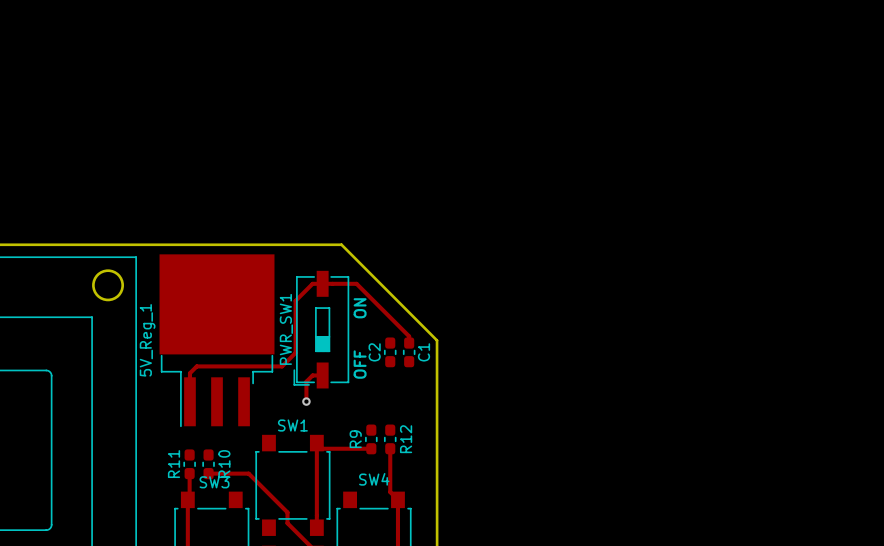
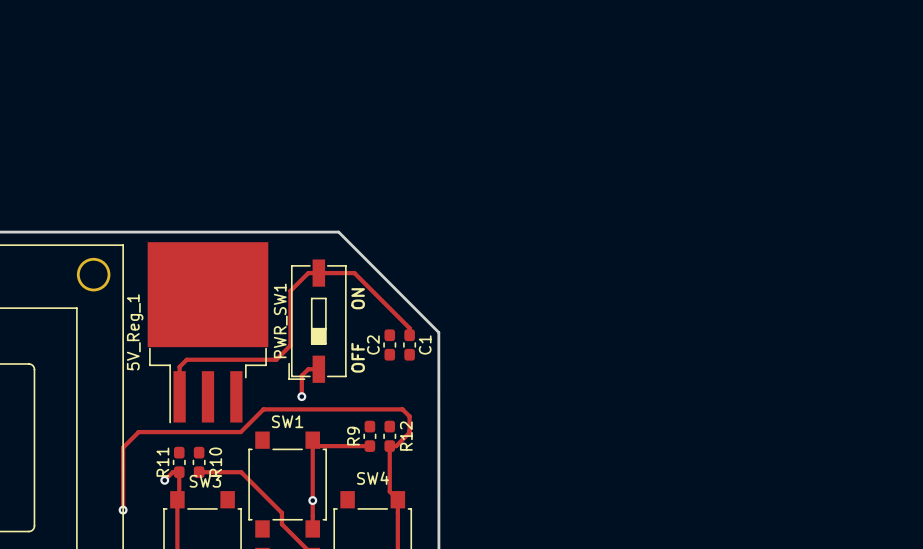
track: none -> (389, 446) (396, 446) (409, 432) (409, 416) (402, 409) (263, 409) (240, 432) (138, 432) (123, 447) (123, 510)
track: none -> (179, 472) (172, 472) (164, 480)
via: none -> (164, 480)
via: none -> (312, 500)
via: none -> (123, 510)

